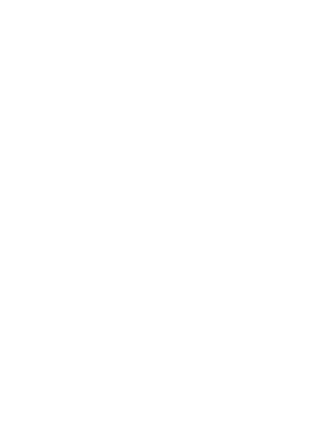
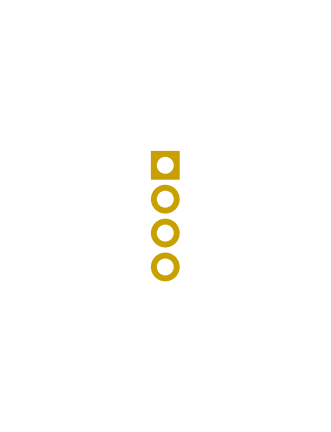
part: none -> (165, 216)

